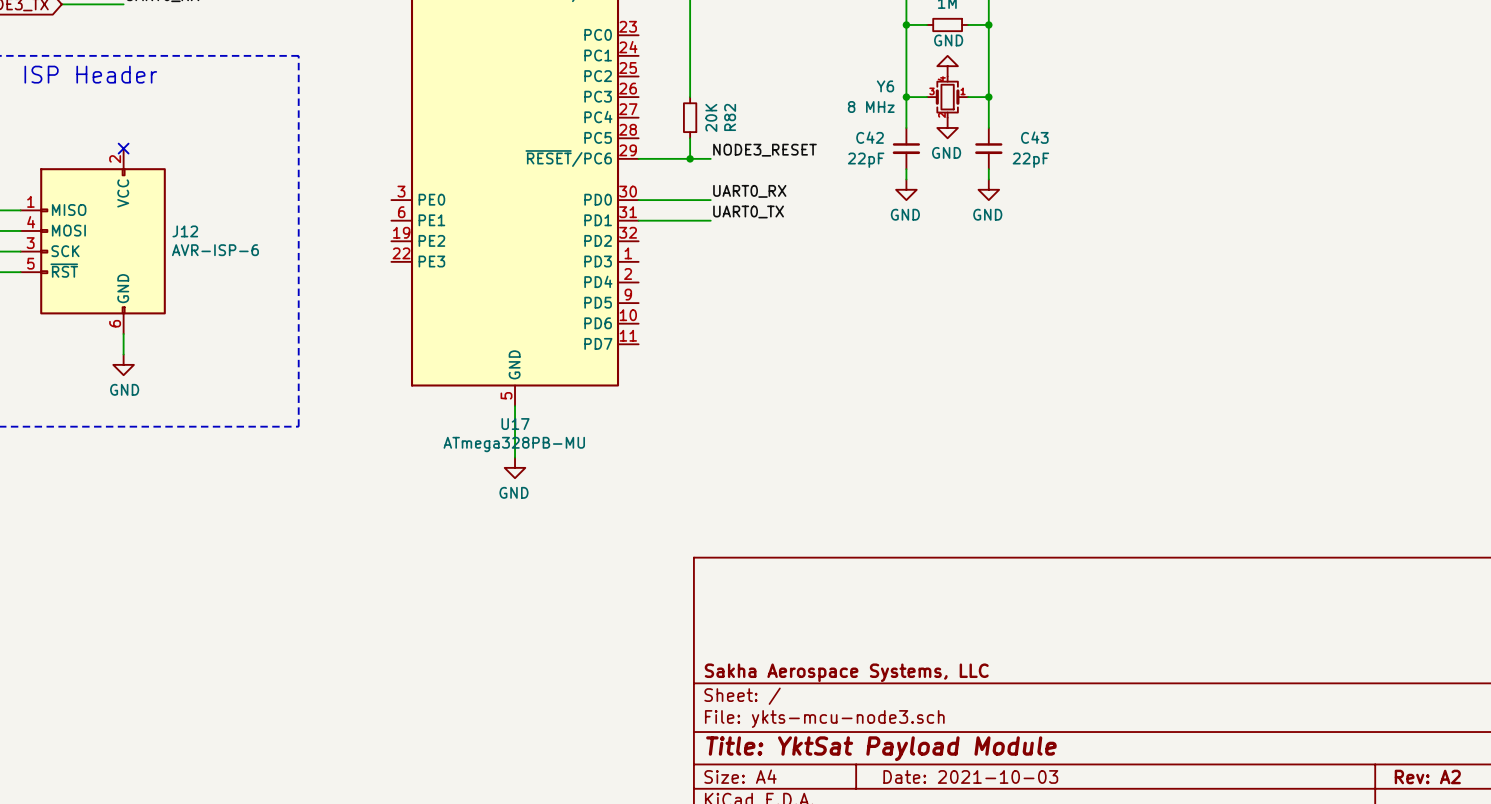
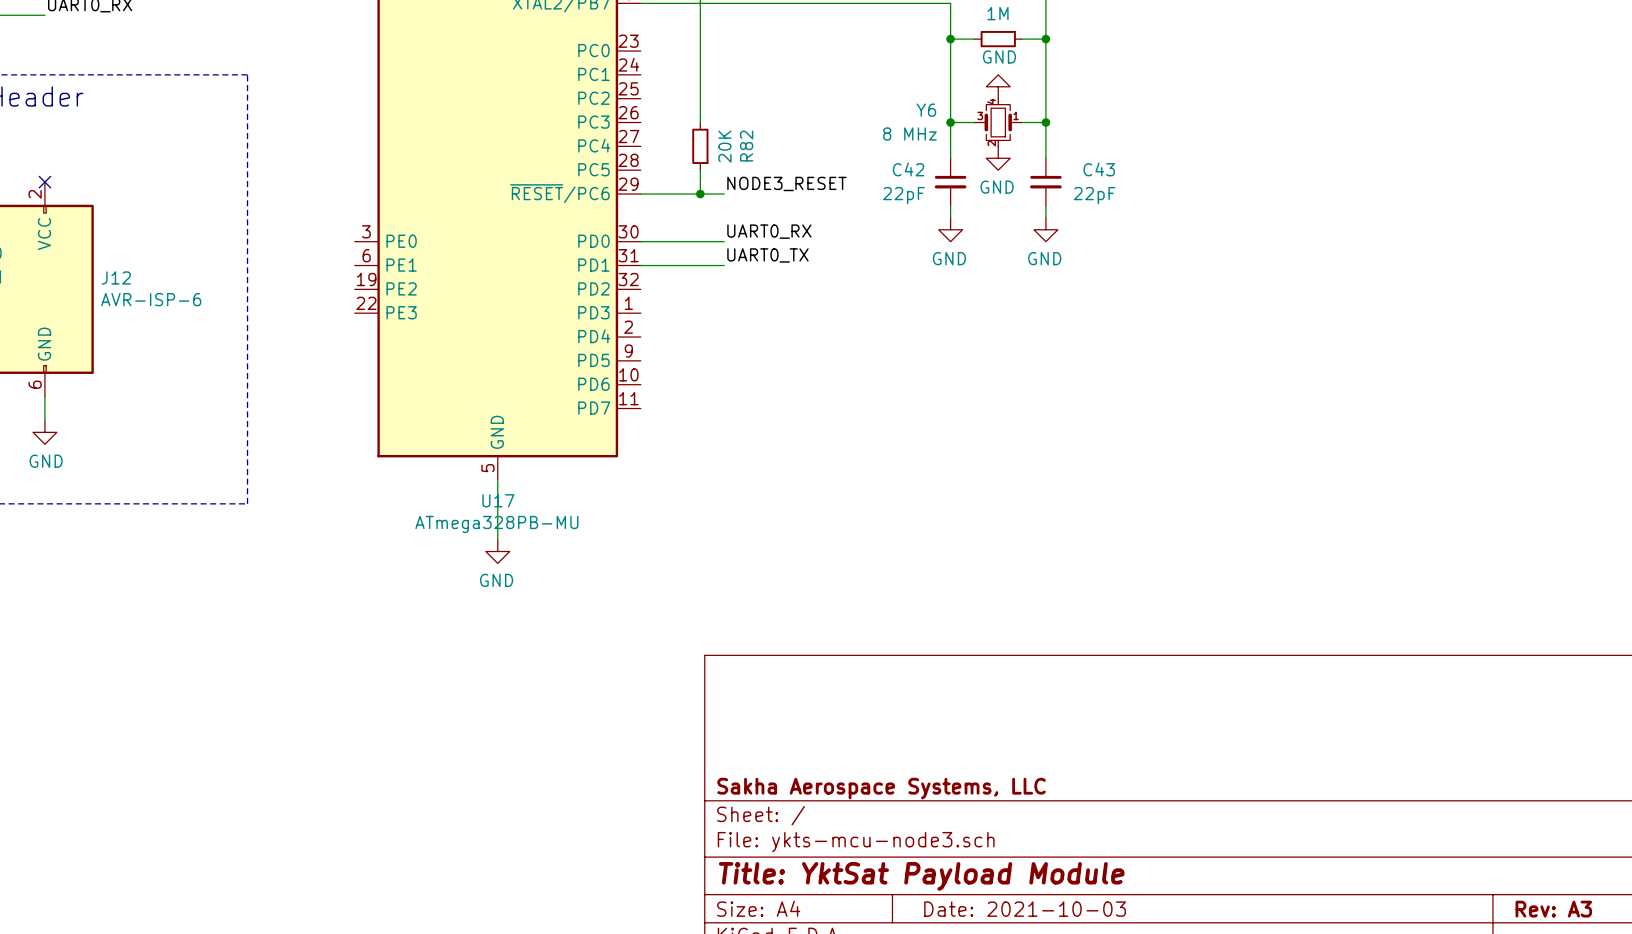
title block: Rev: A2 (1427, 776) -> Rev: A3 (1553, 909)

